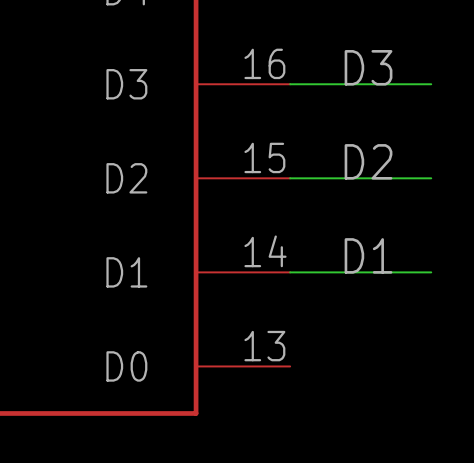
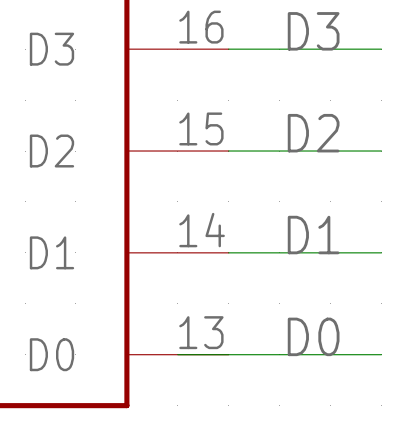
label: none -> D0 (313, 336)
wire: none -> (177, 354) (381, 354)

